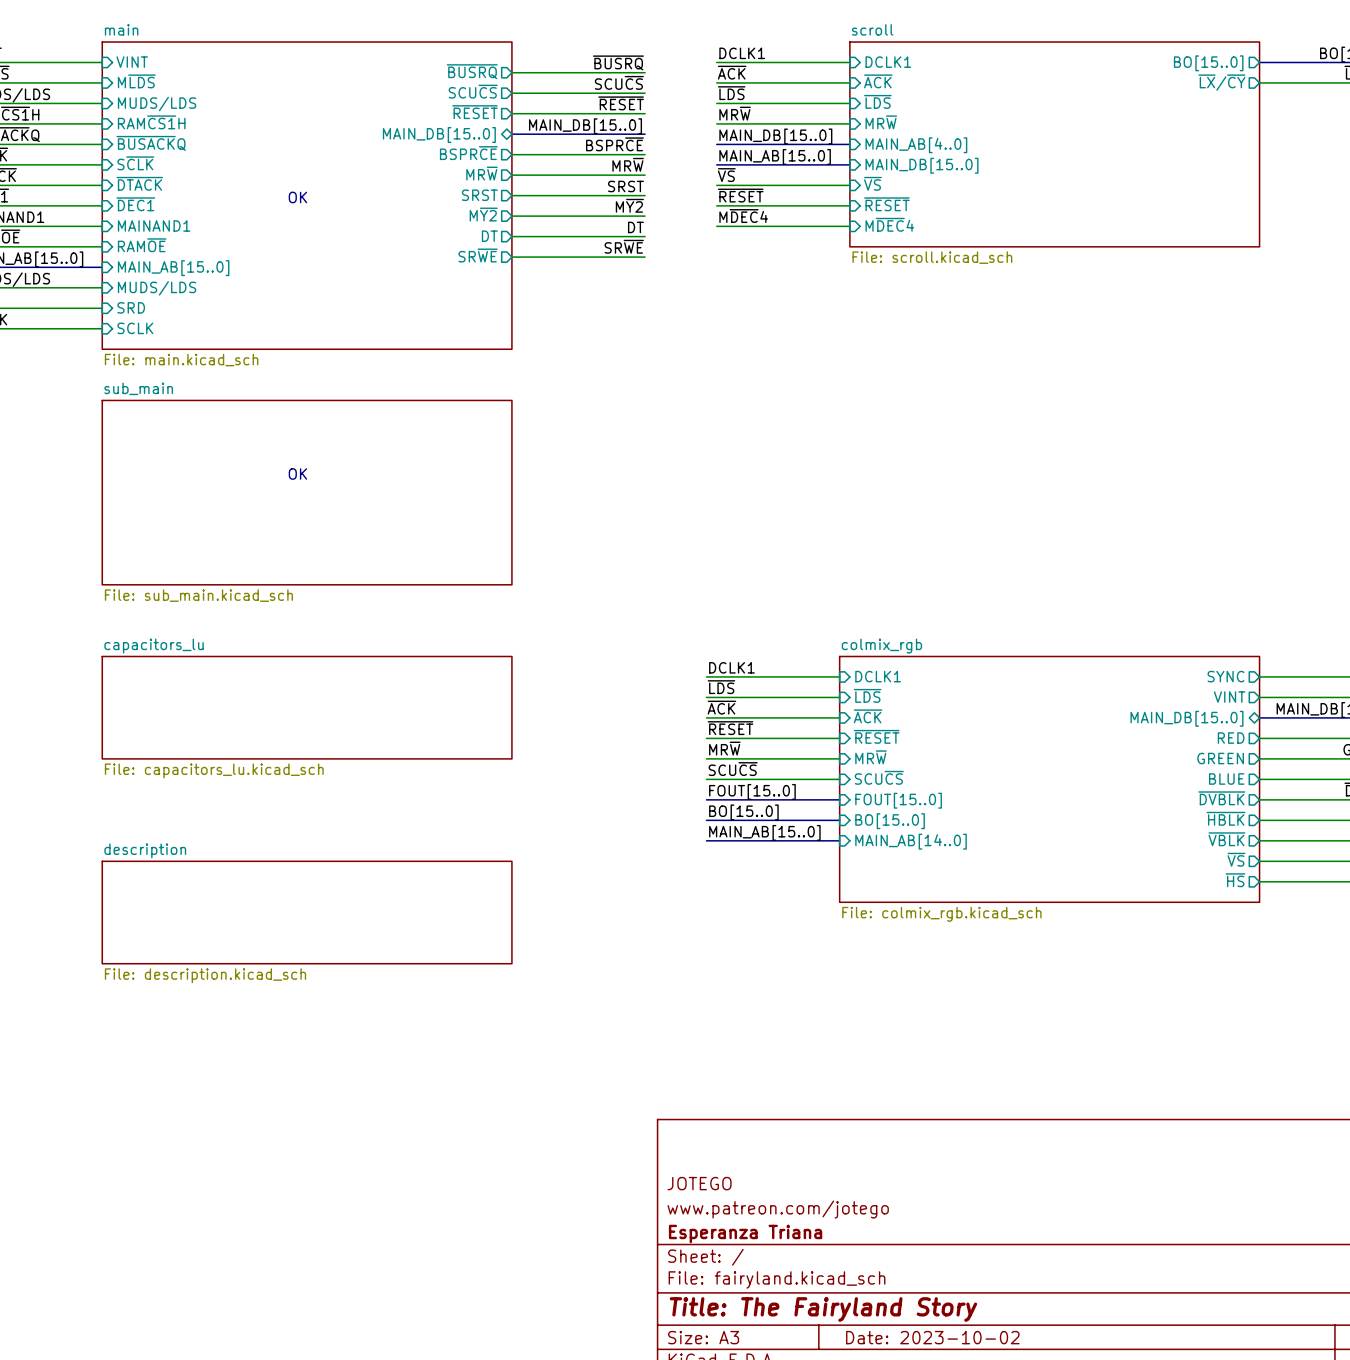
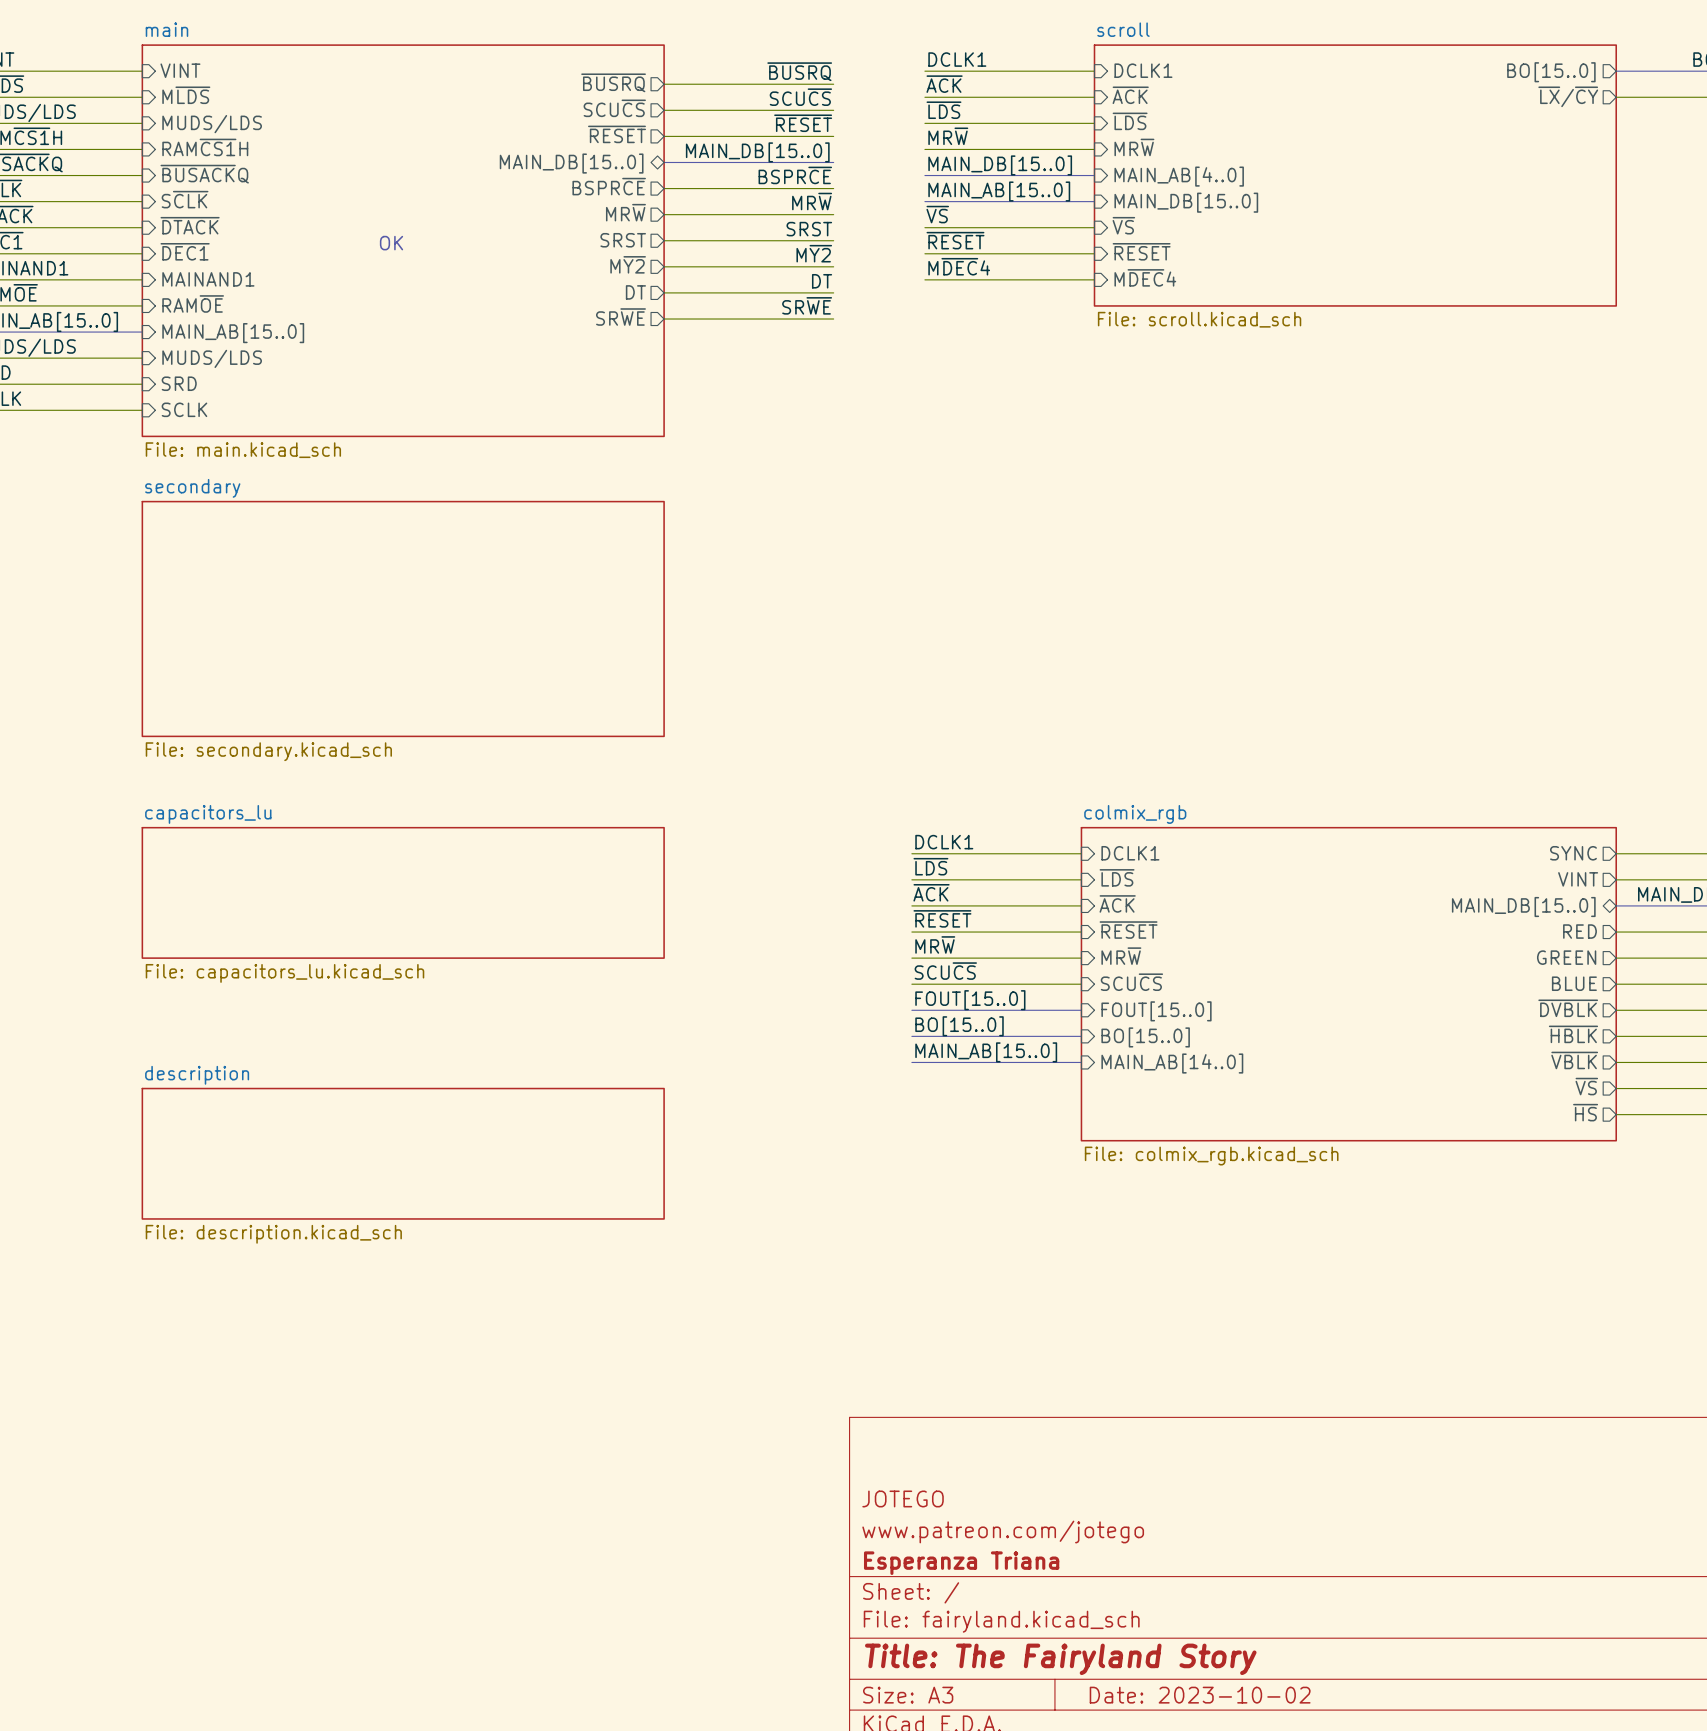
sheet sub_main name: sub_main (138, 388) -> secondary (192, 488)
text: OK (297, 474) -> none
sheet sub_main value: File: sub_main.kicad_sch (198, 595) -> File: secondary.kicad_sch (268, 751)

